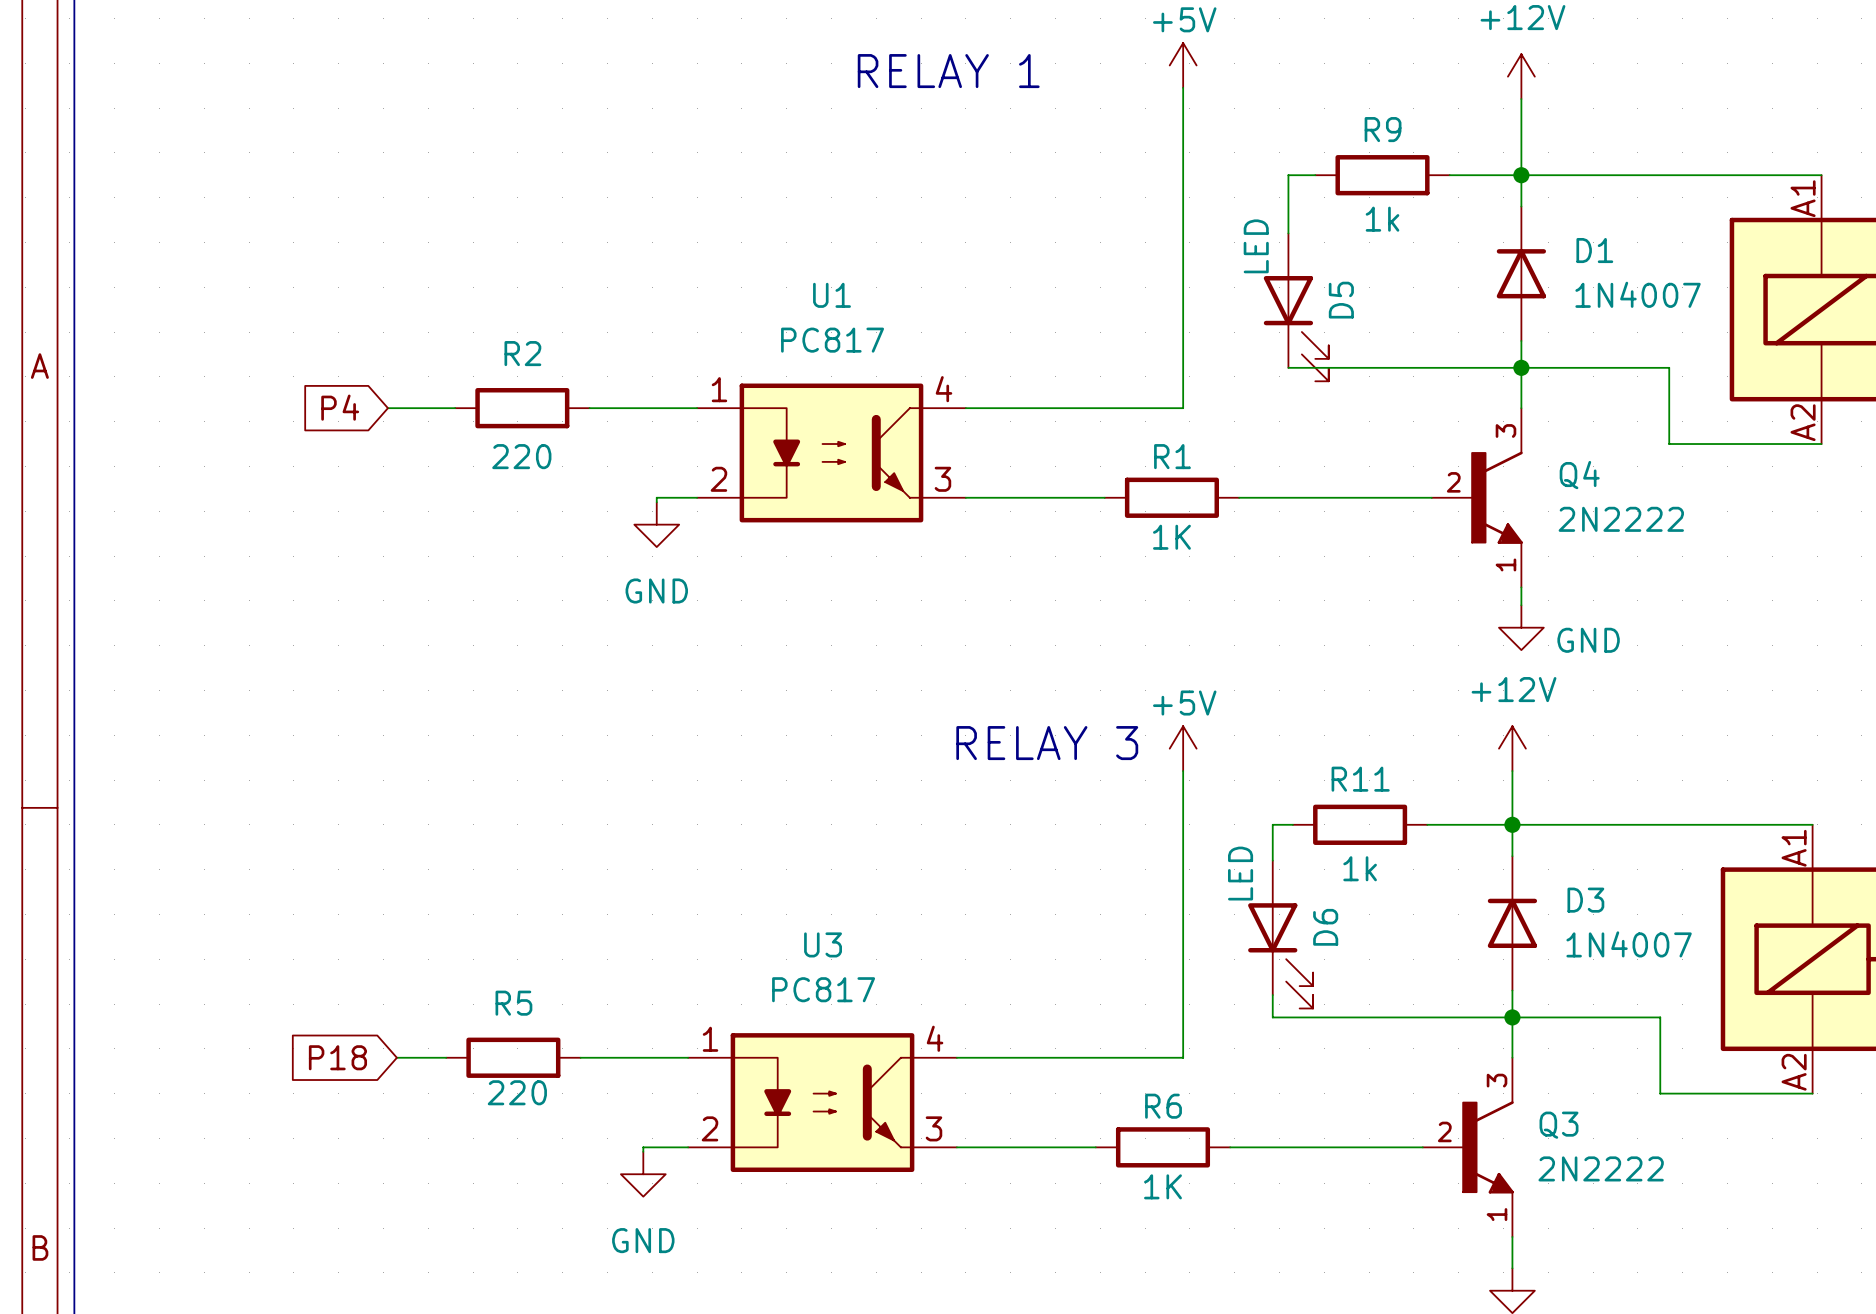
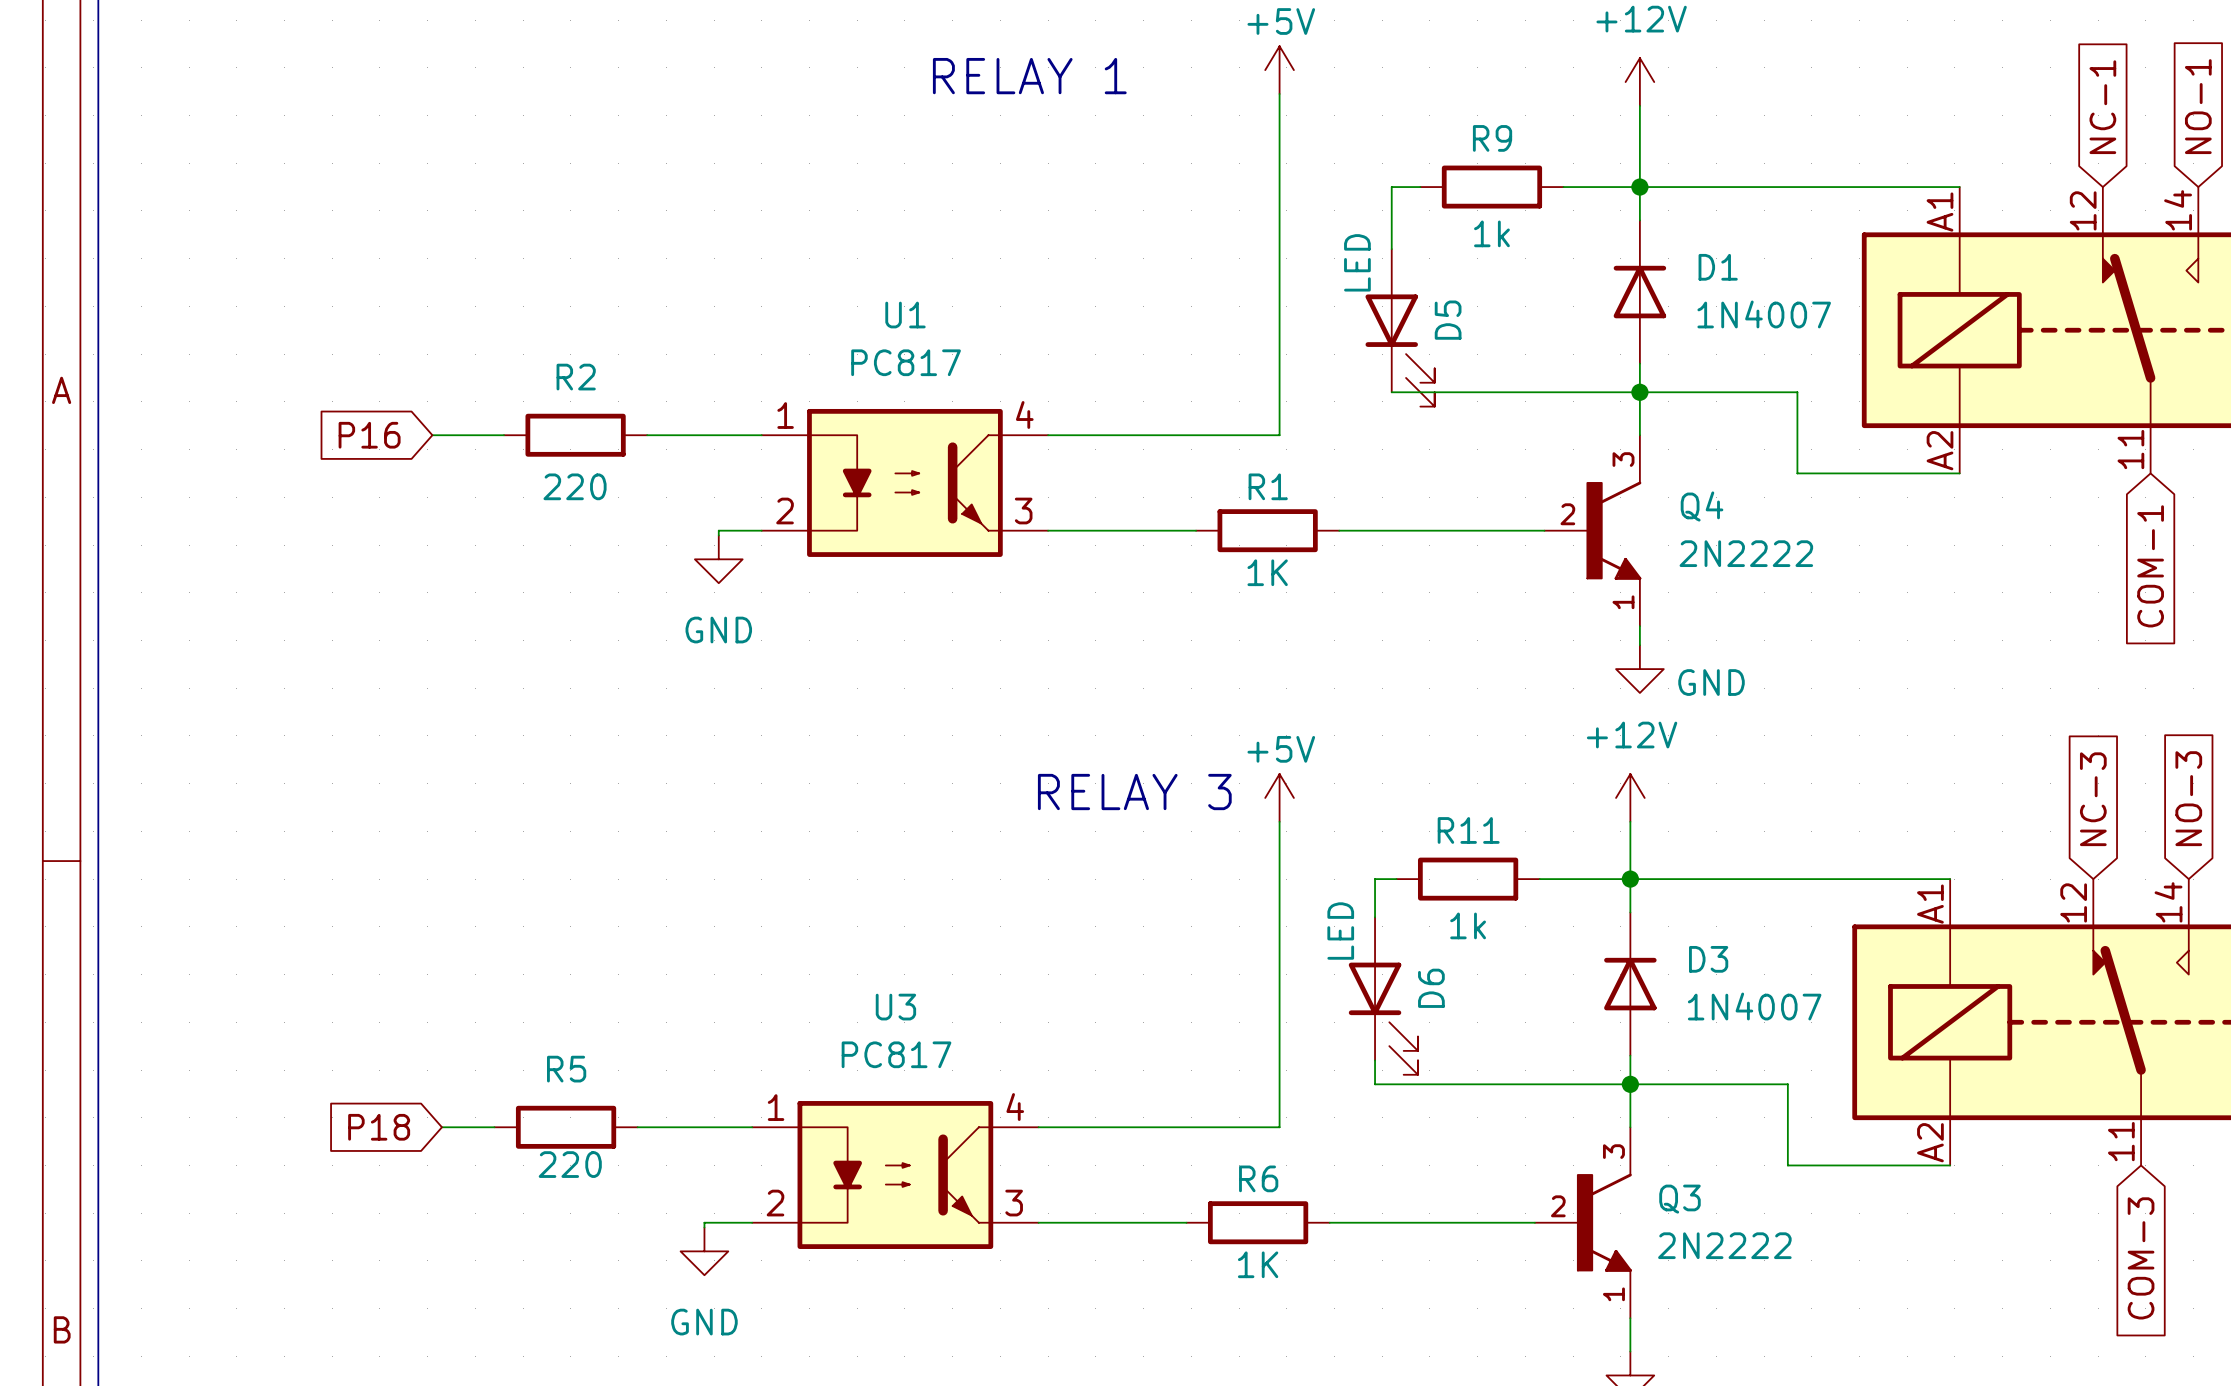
global label: P4 (340, 407) -> P16 (369, 435)

